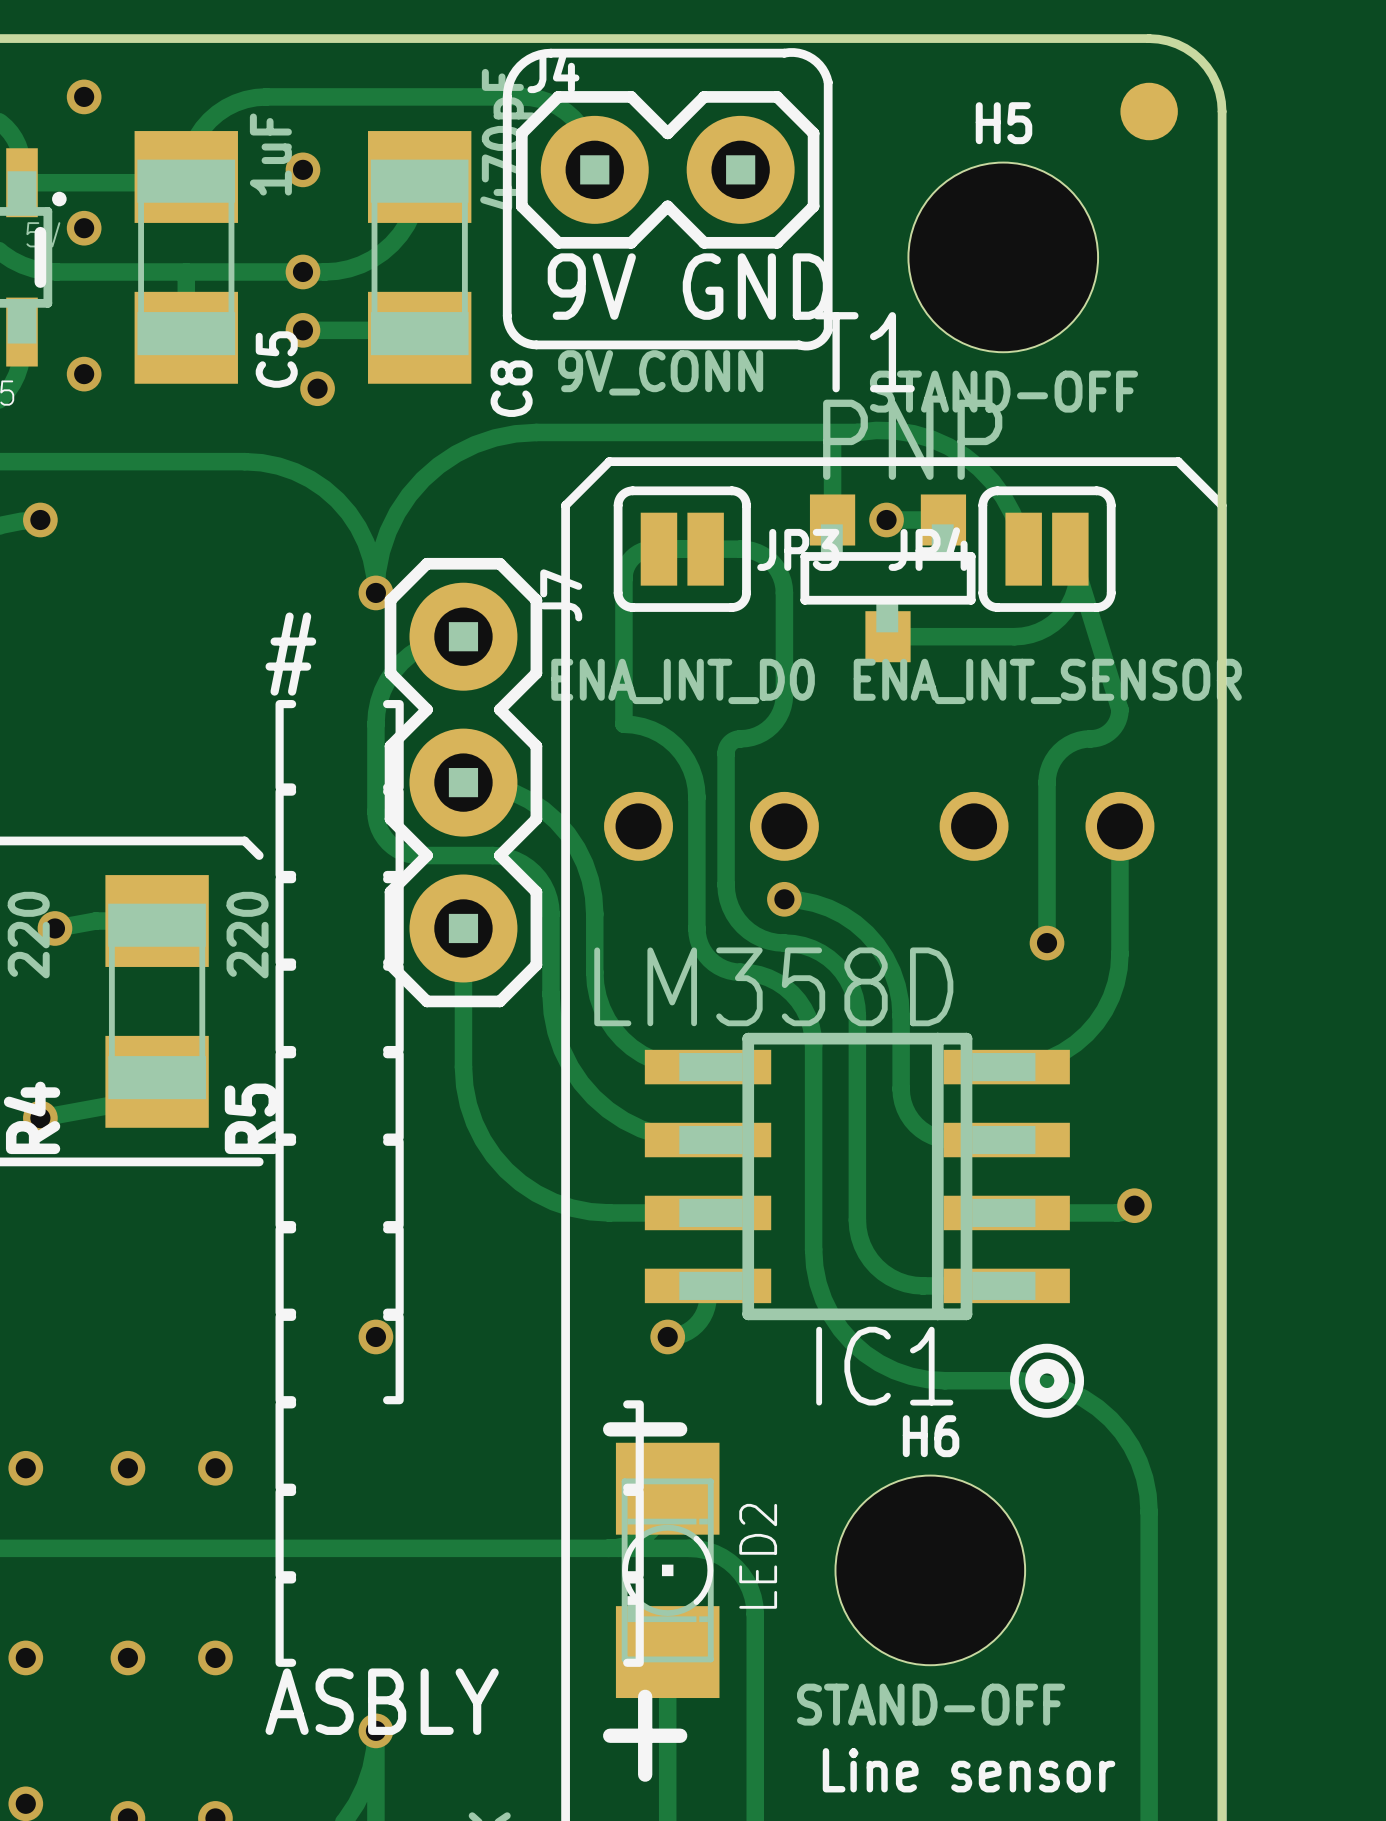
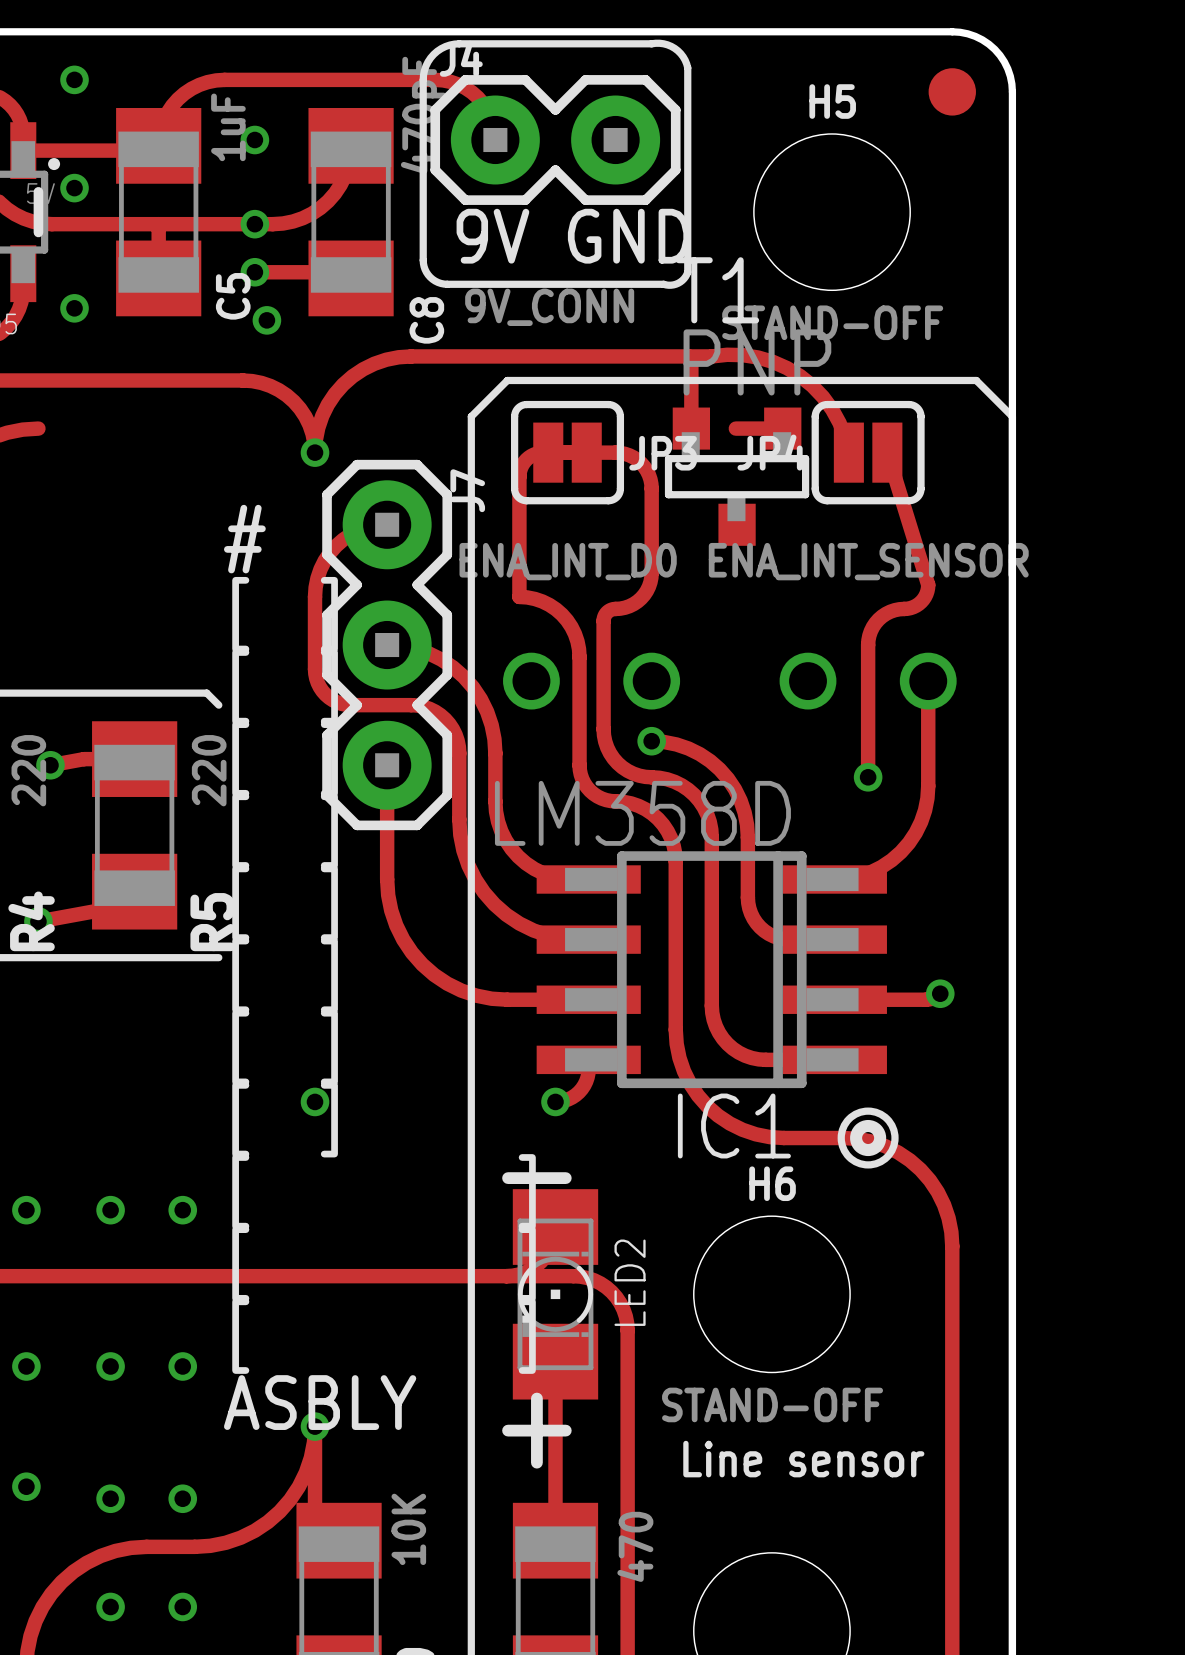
track: (536, 432) (494, 437) (474, 444) (456, 453) (422, 479) (409, 495) (388, 531) (381, 551) (375, 592) (371, 558) (365, 542) (348, 513) (337, 500) (324, 488) (294, 471) (278, 466) (244, 461) -> (447, 356) (411, 356) (386, 359) (363, 369) (352, 376) (334, 394) (322, 415) (315, 440) (315, 452) (312, 433) (305, 416) (293, 401) (278, 390) (252, 381) (206, 380)
via: (40, 519) -> none
via: (886, 519) -> none
track: (1077, 573) (1073, 597) (1064, 611) (1053, 623) (1030, 634) (1014, 636) (888, 636) -> none
via position: (375, 592) -> (315, 452)

